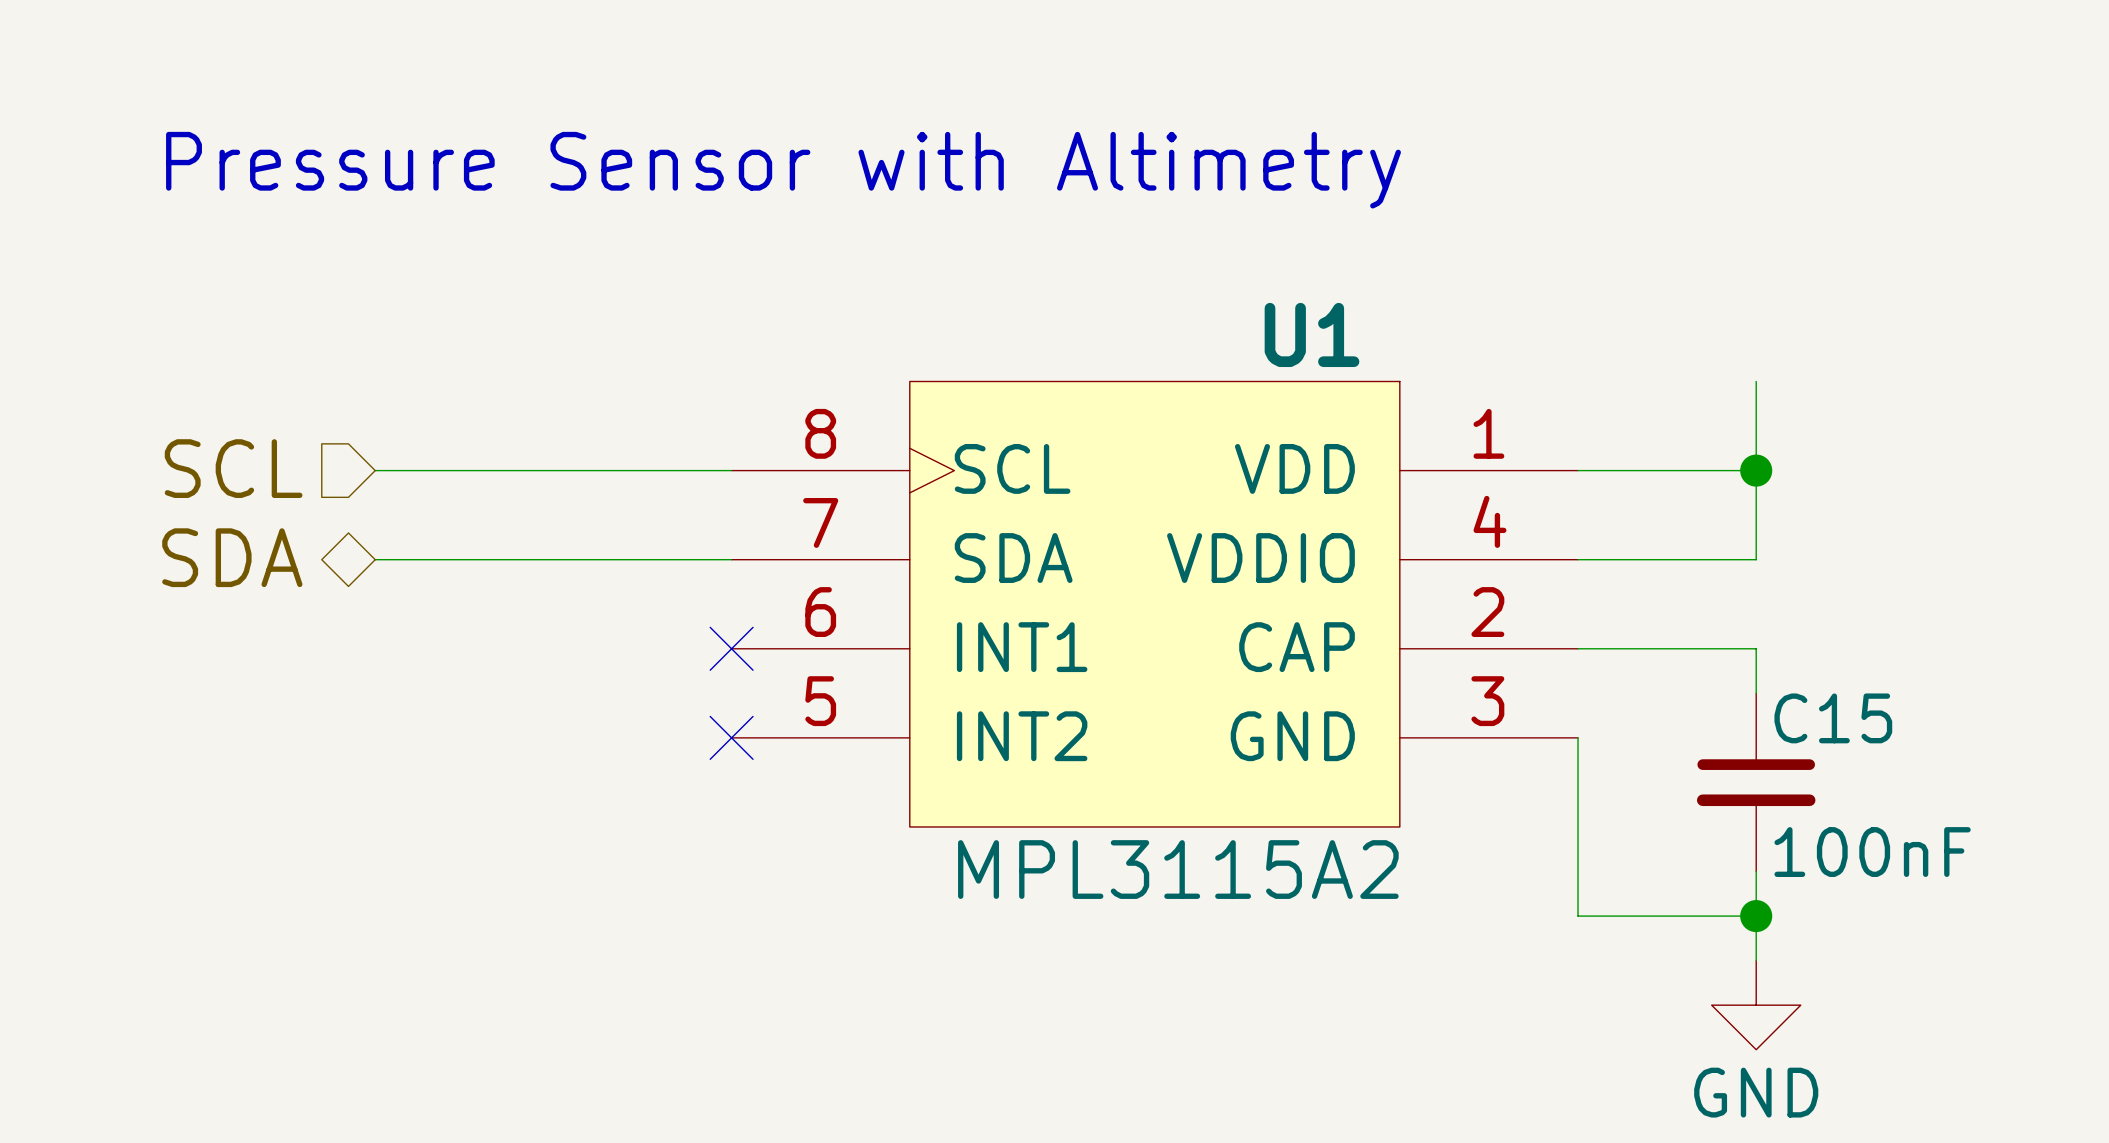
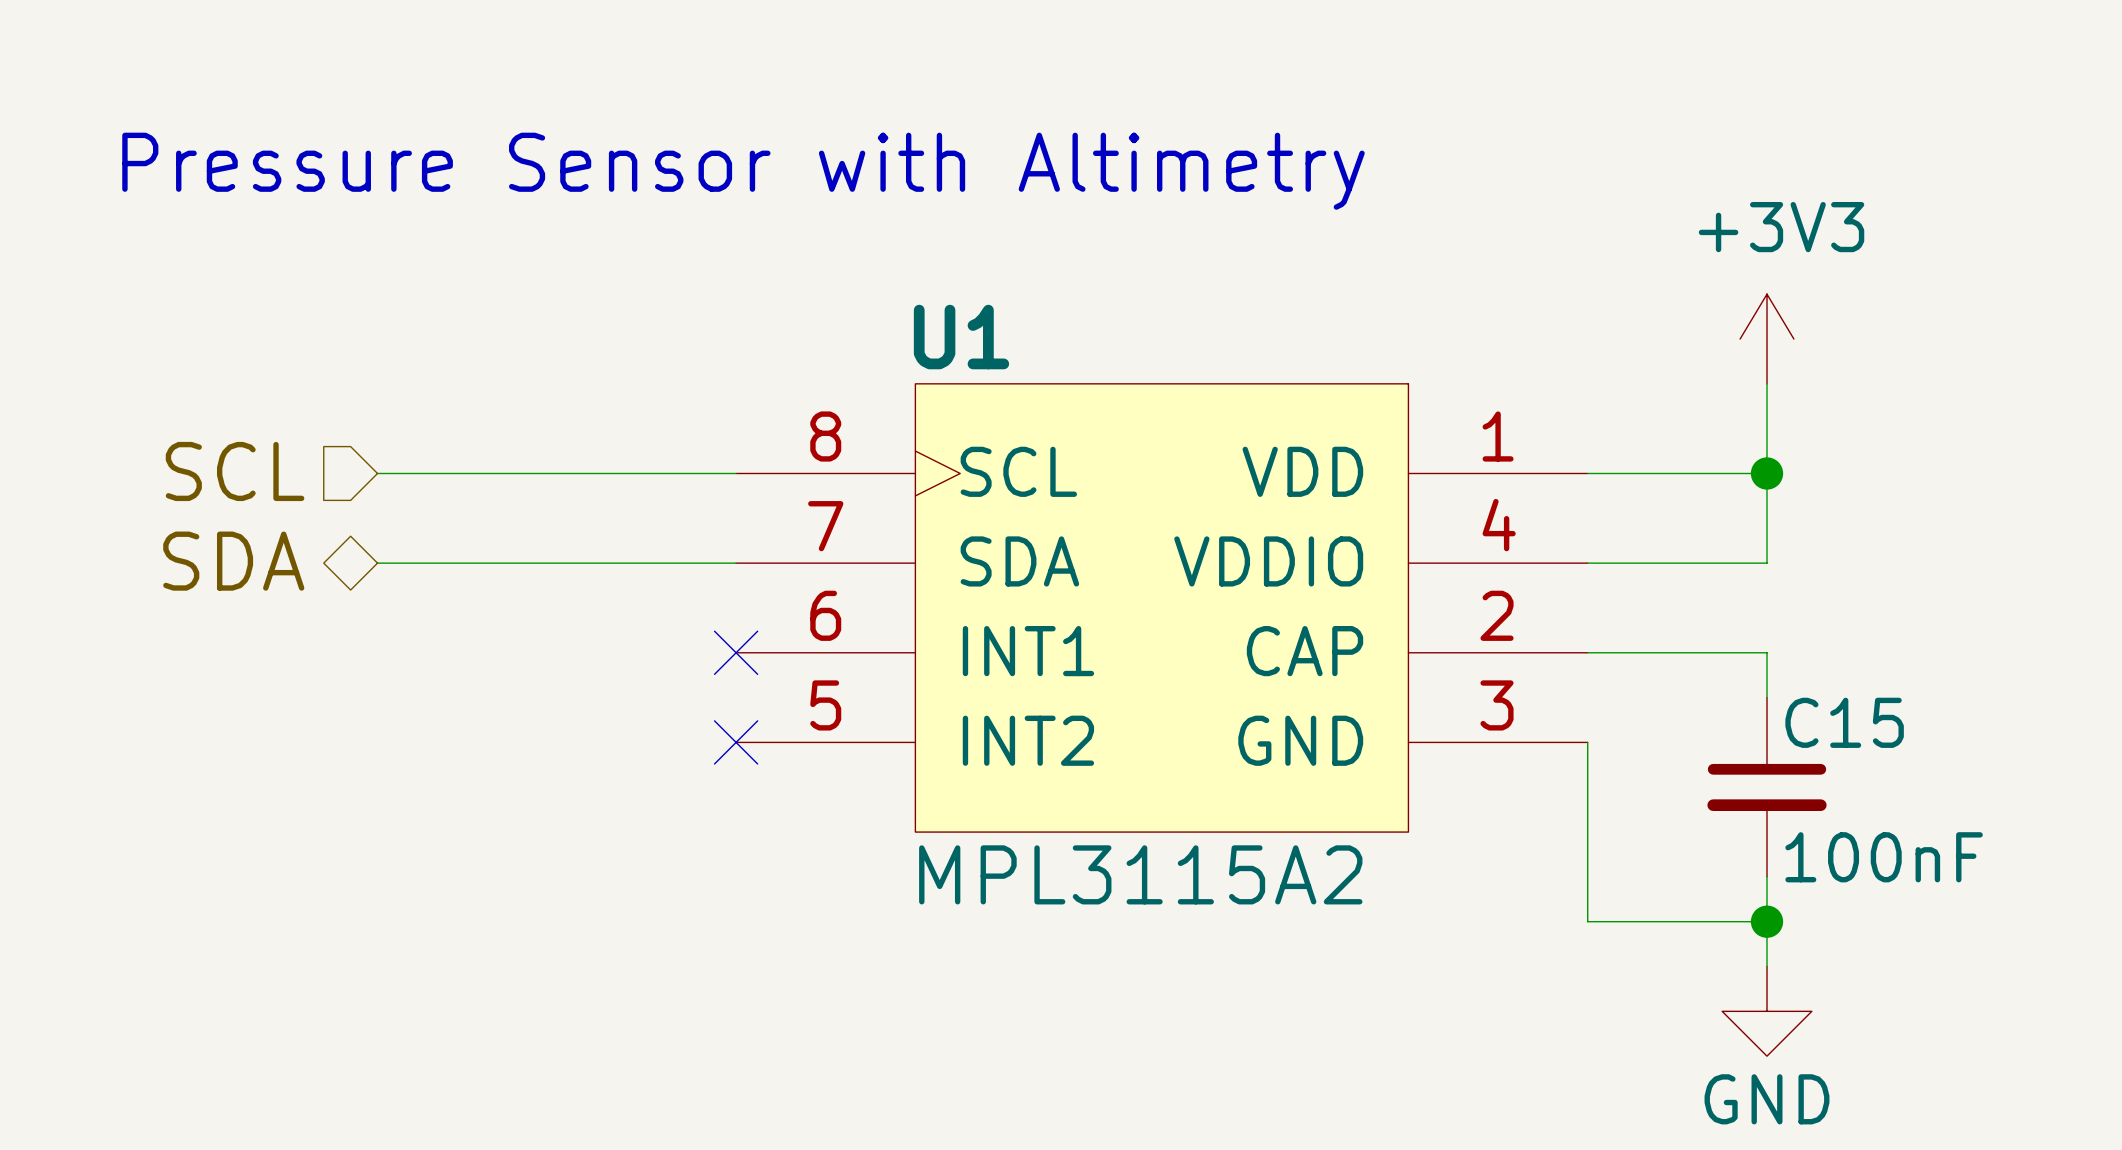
text position: Pressure Sensor with Altimetry (783, 170) -> Pressure Sensor with Altimetry (743, 171)
U1 name position: U1 (1312, 334) -> U1 (961, 337)
power symbol: none -> +3V3 (1767, 339)
U1 value position: MPL3115A2 (1178, 869) -> MPL3115A2 (1140, 874)

